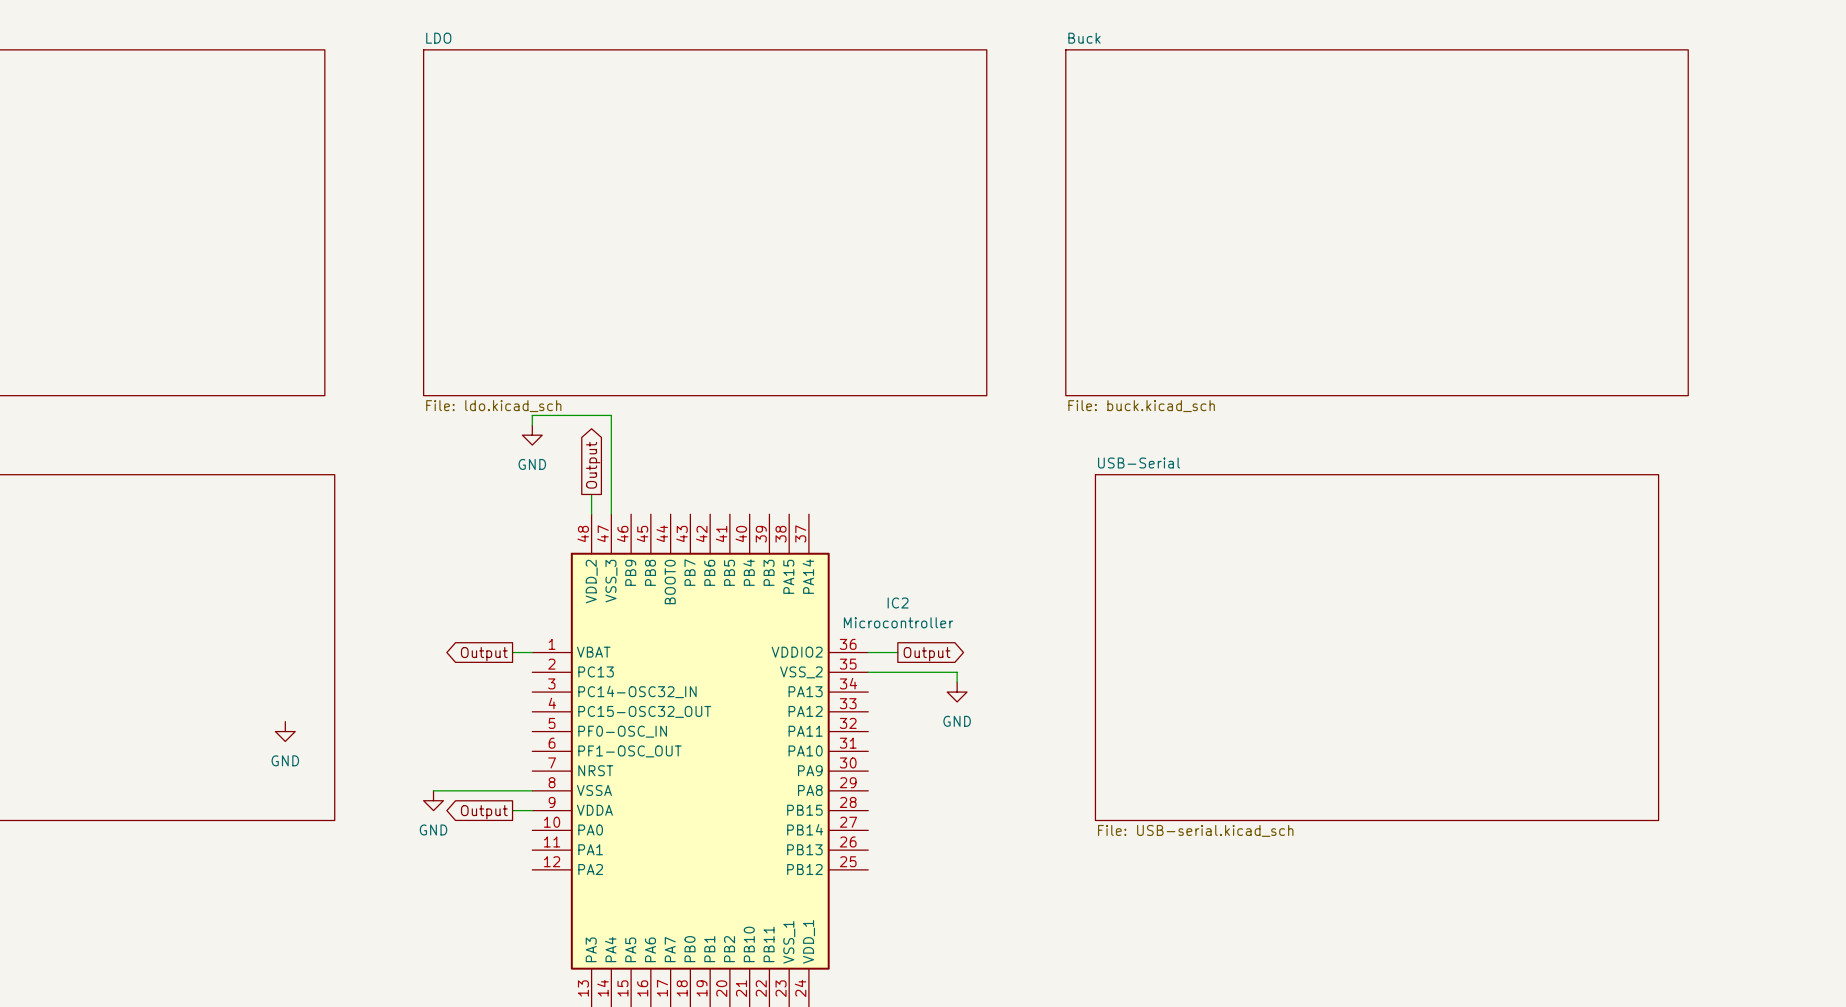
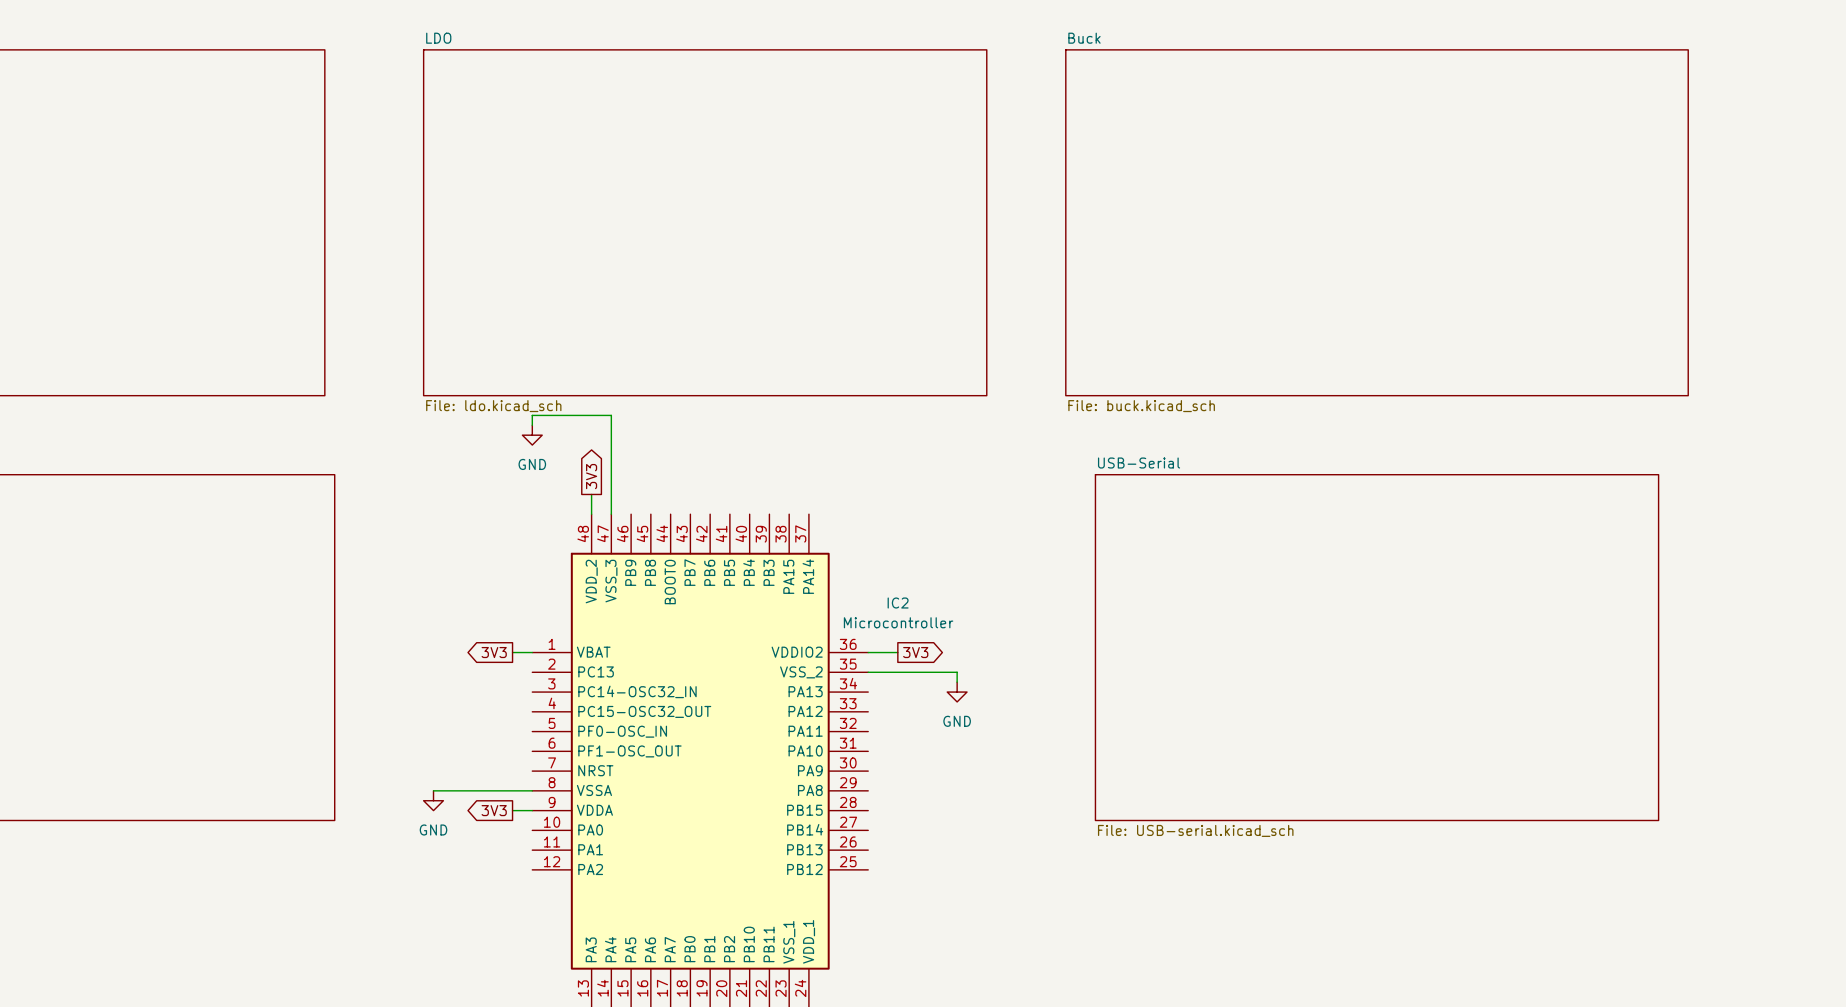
global label: Output (593, 465) -> 3V3 (591, 476)
global label: Output (484, 654) -> 3V3 (494, 652)
global label: Output (927, 654) -> 3V3 (915, 652)
power symbol: GND (285, 731) -> none
global label: Output (484, 812) -> 3V3 (494, 810)

